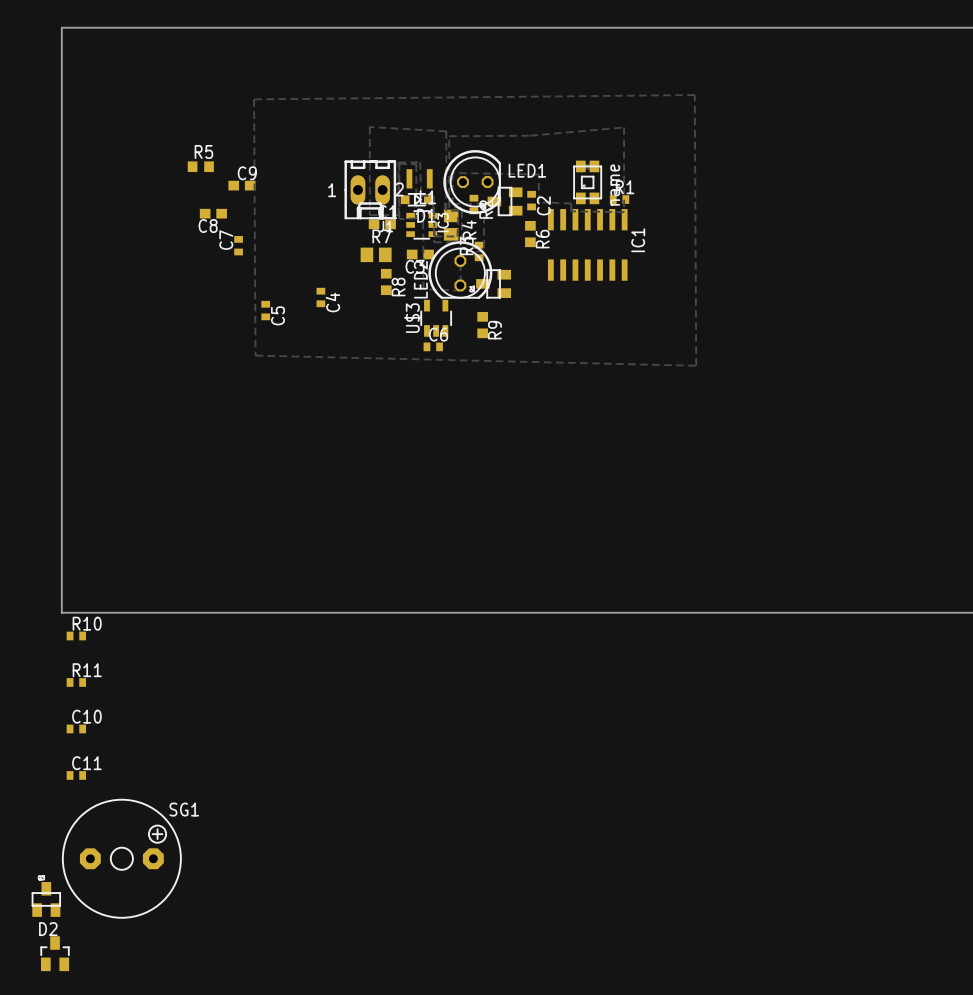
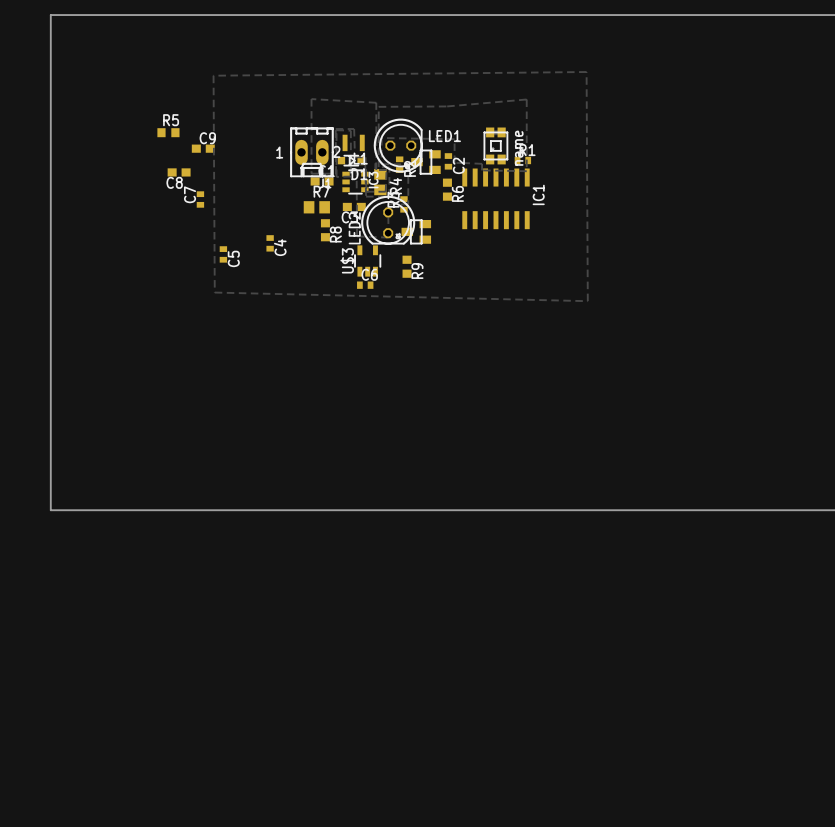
R10: (76, 635) -> none
R11: (76, 682) -> none
C10: (76, 728) -> none
C11: (76, 775) -> none
SG1: (121, 858) -> none
part: (46, 899) -> none
D2: (55, 953) -> none

